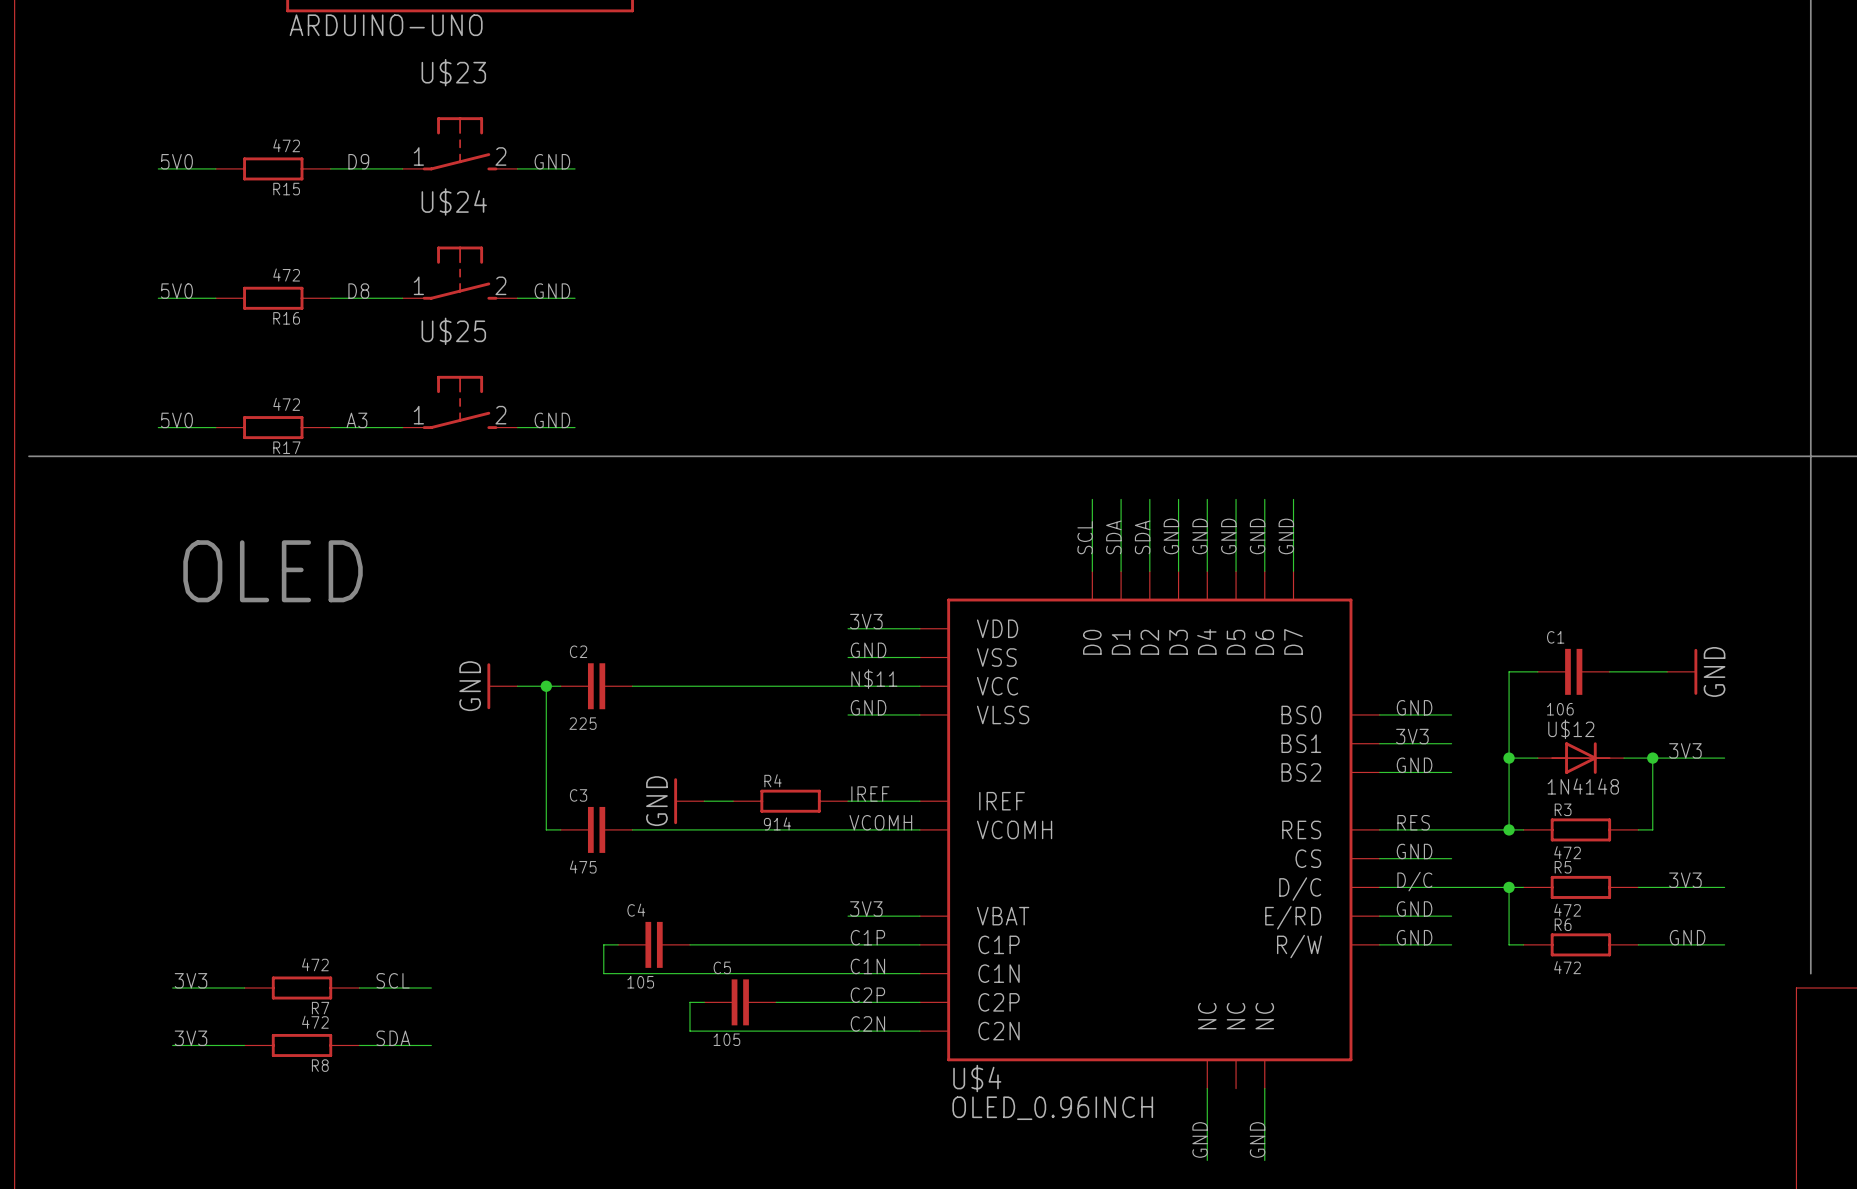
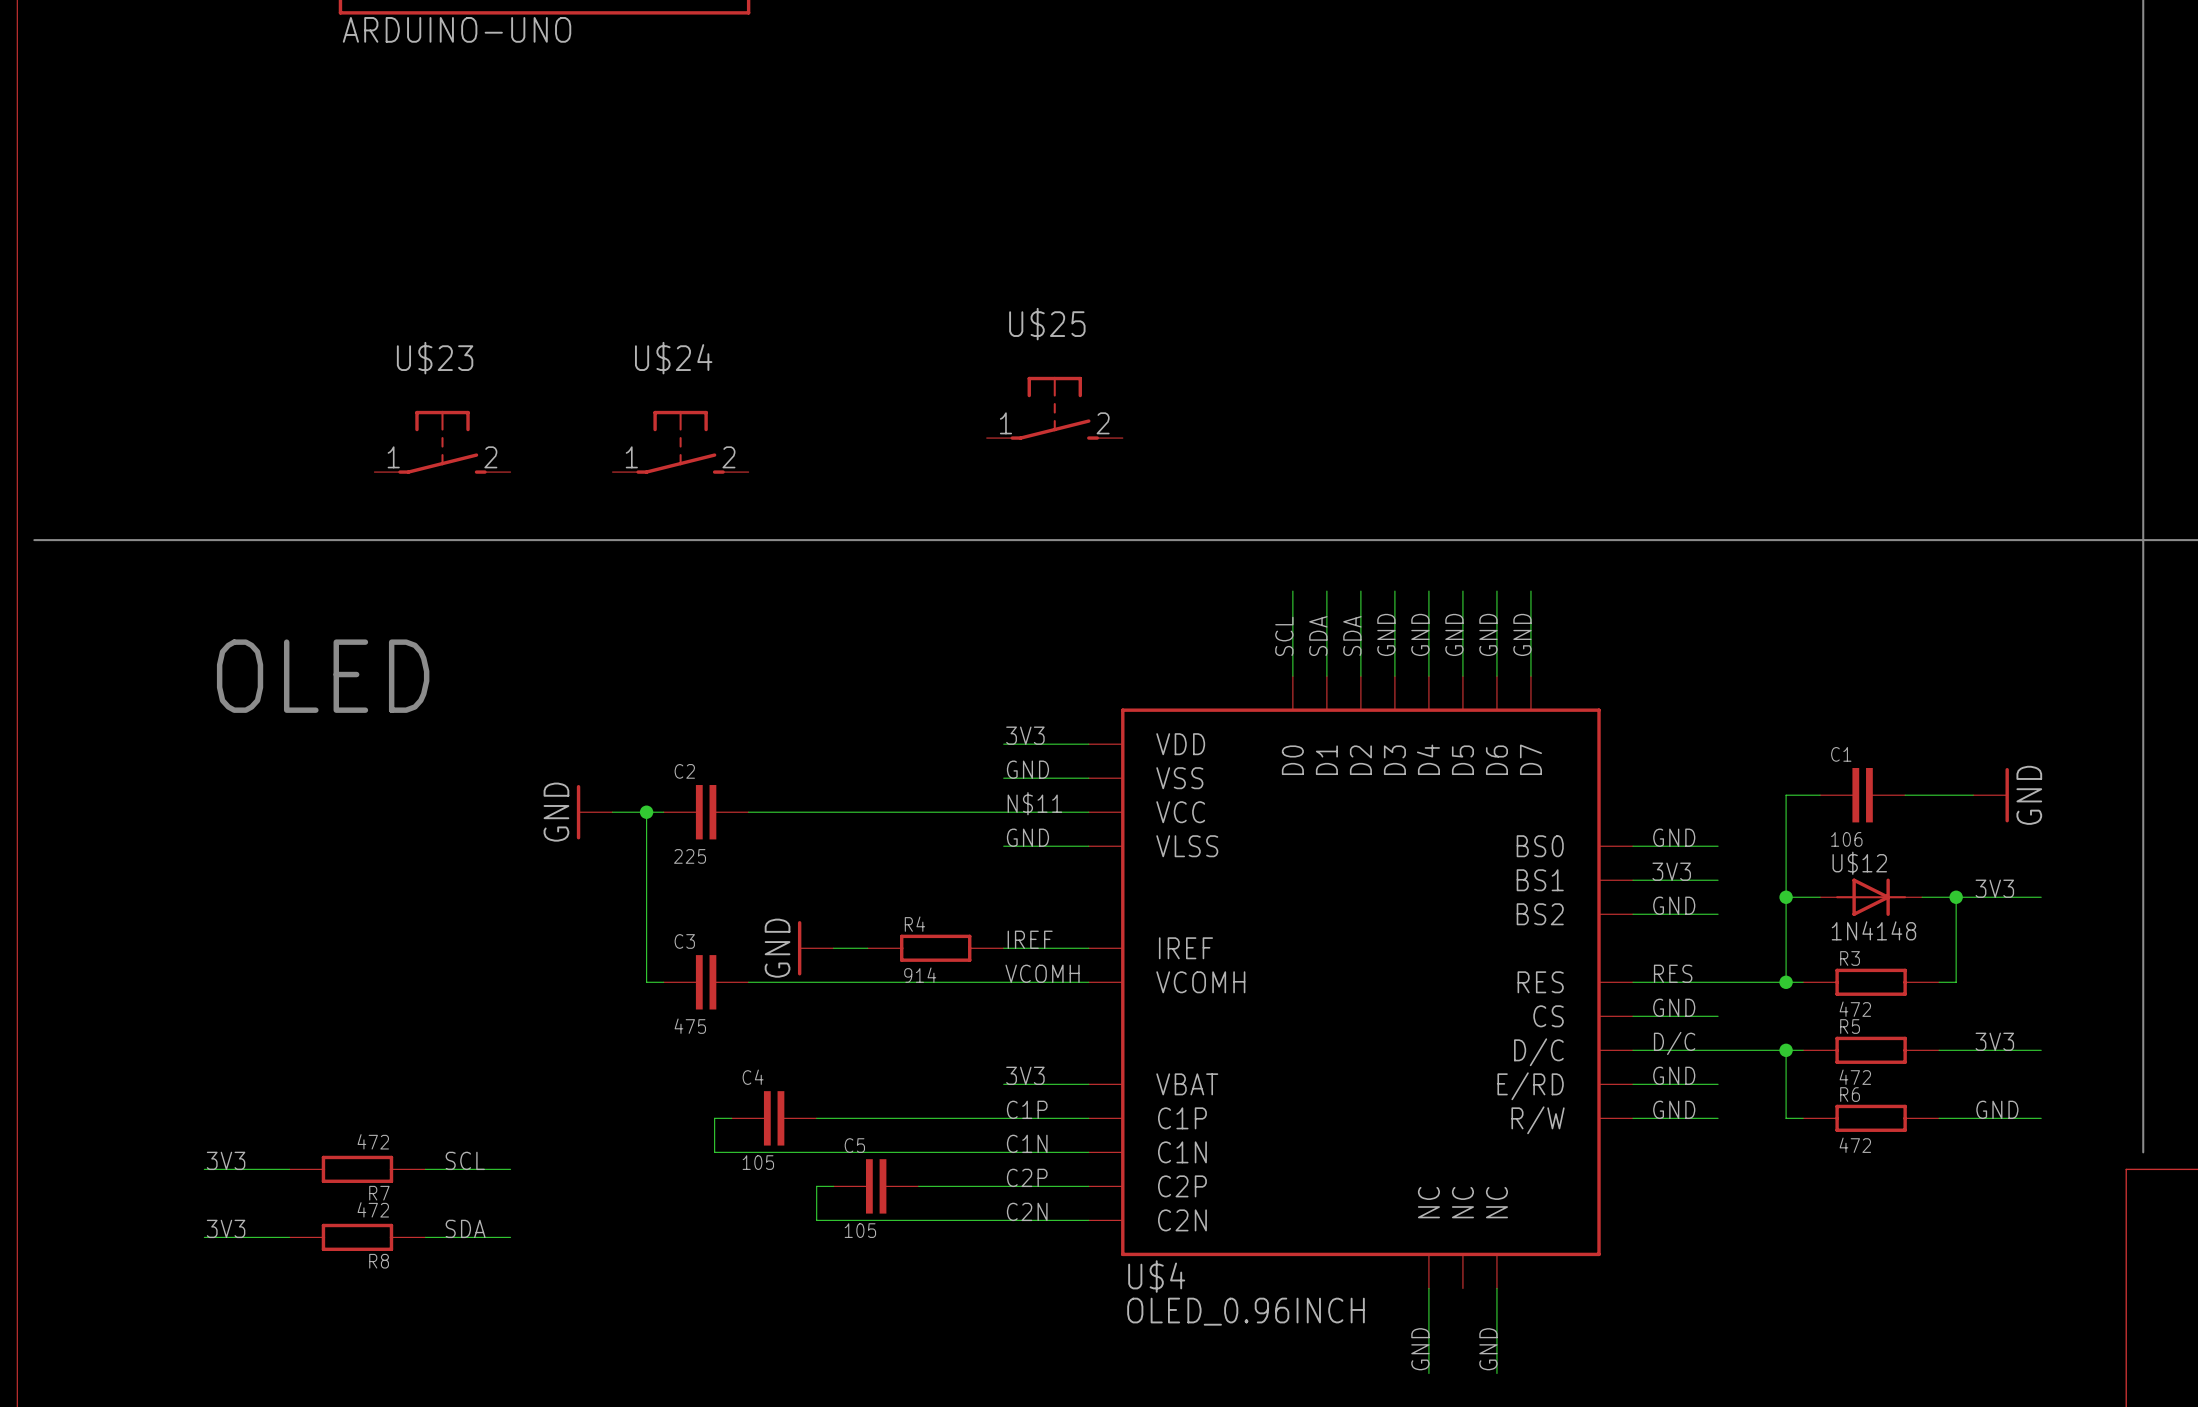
U$23 position: (460, 143) -> (442, 442)
label: 5V0 (176, 161) -> none
label: D9 (358, 161) -> none
label: GND (552, 161) -> none
wire: (158, 168) (215, 168) -> none
R15: 472 (273, 168) -> none
wire: (330, 168) (402, 168) -> none
wire: (517, 168) (575, 168) -> none
U$24 position: (460, 273) -> (680, 442)
label: 5V0 (176, 291) -> none
label: D8 (358, 291) -> none
label: GND (552, 291) -> none
wire: (158, 298) (215, 298) -> none
R16: 472 (273, 298) -> none
wire: (330, 298) (402, 298) -> none
wire: (517, 298) (575, 298) -> none
U$25 position: (460, 402) -> (1054, 408)
label: 5V0 (176, 420) -> none
label: A3 (356, 420) -> none
label: GND (552, 420) -> none
wire: (158, 427) (215, 427) -> none
R17: 472 (273, 427) -> none
wire: (330, 427) (402, 427) -> none
wire: (517, 427) (575, 427) -> none

